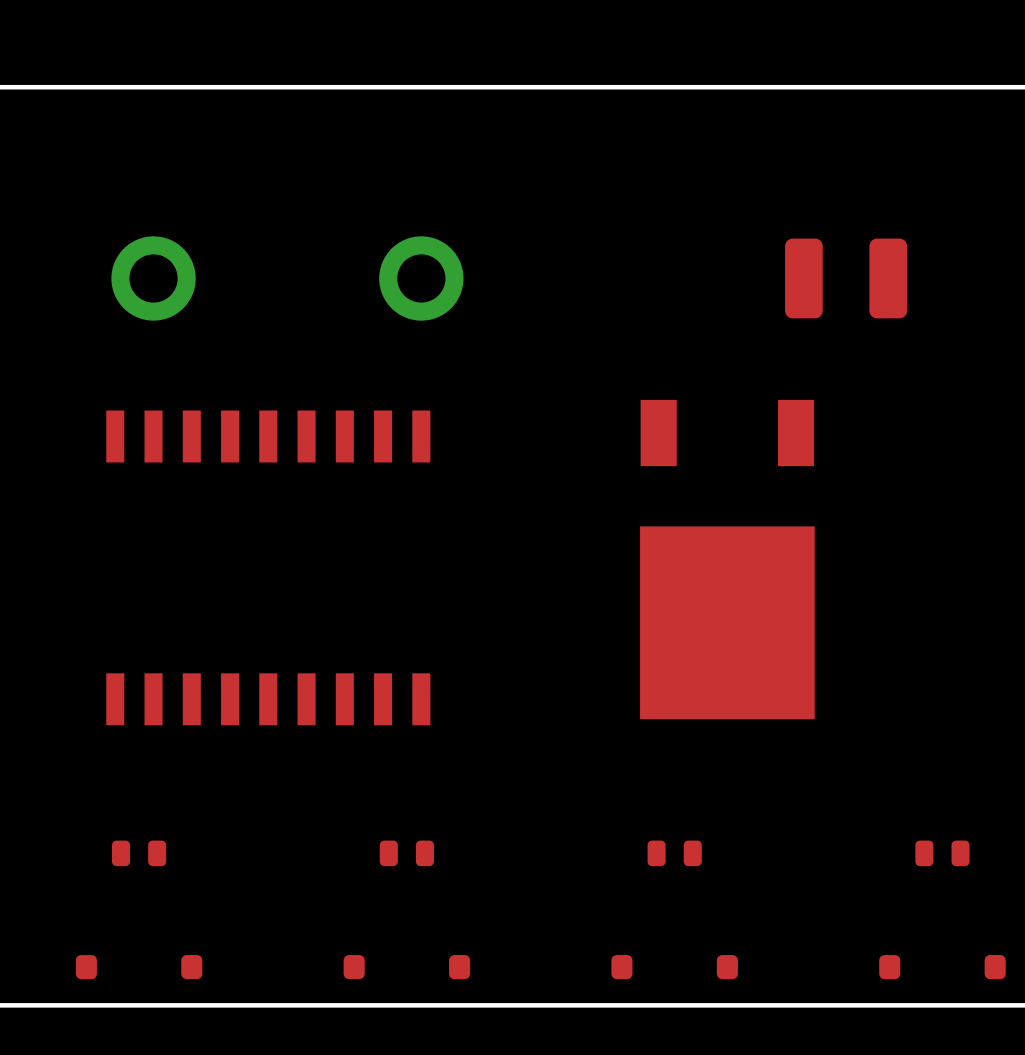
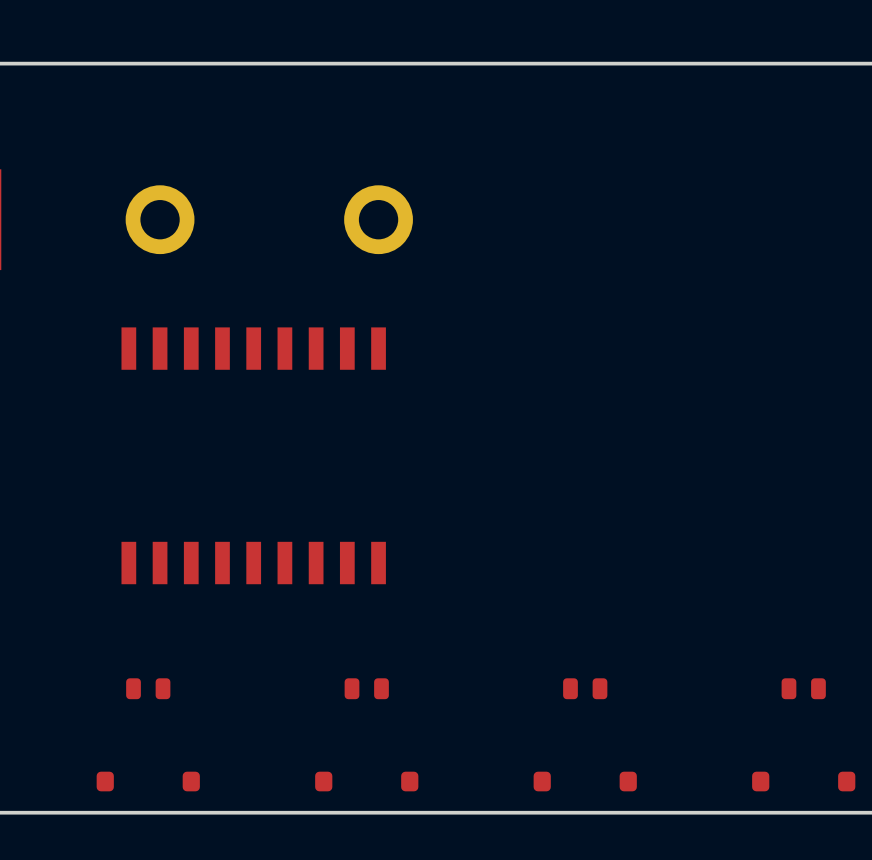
part: (846, 278) -> none
part: (727, 559) -> none

